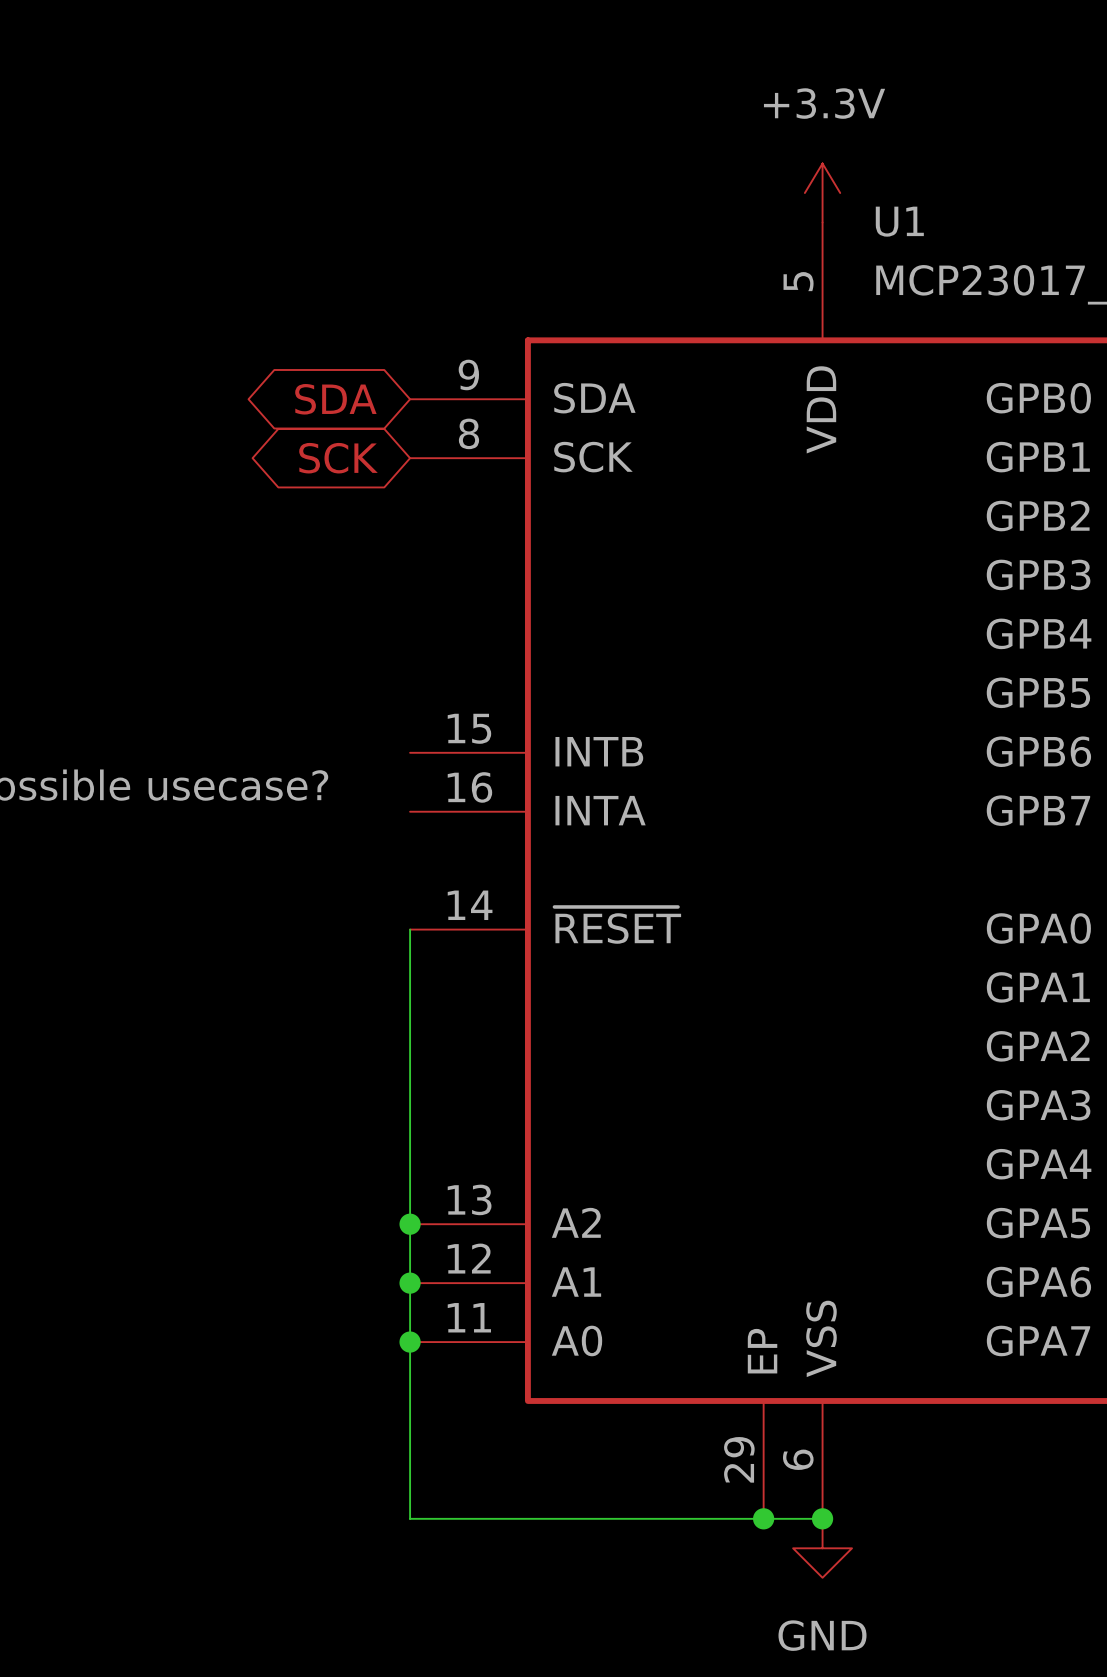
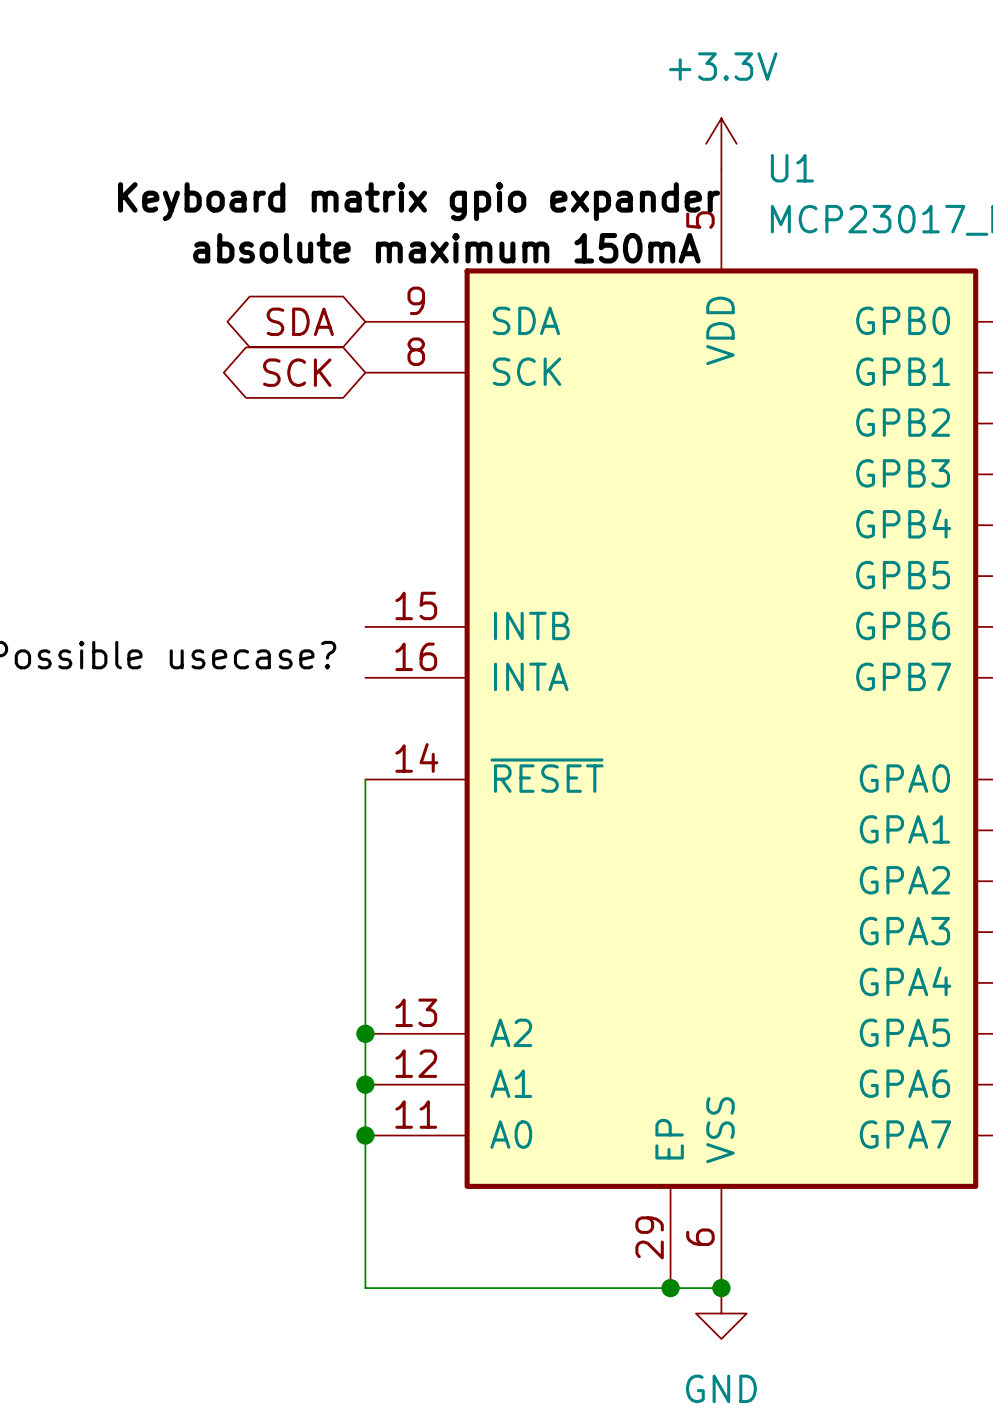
label: none -> Keyboard matrix gpio expander (419, 201)
label: none -> absolute maximum 150mA (446, 248)

